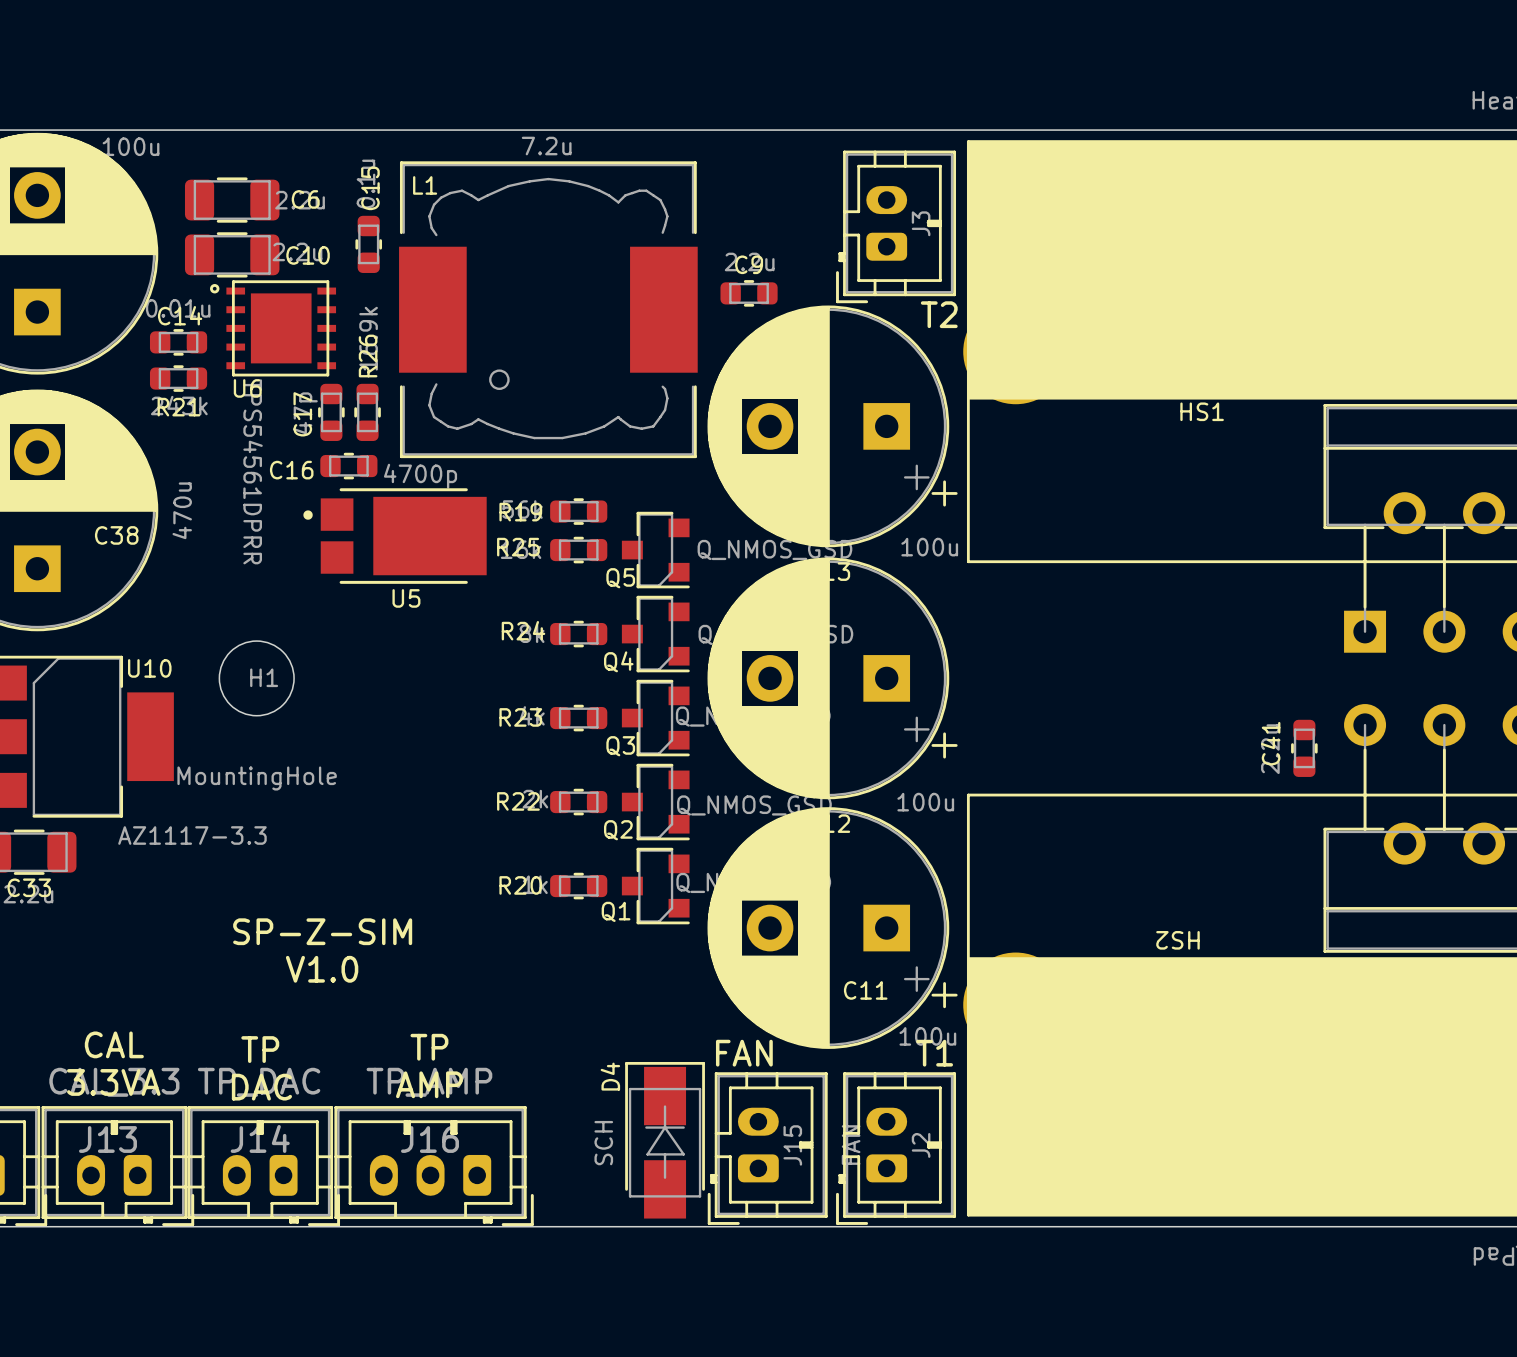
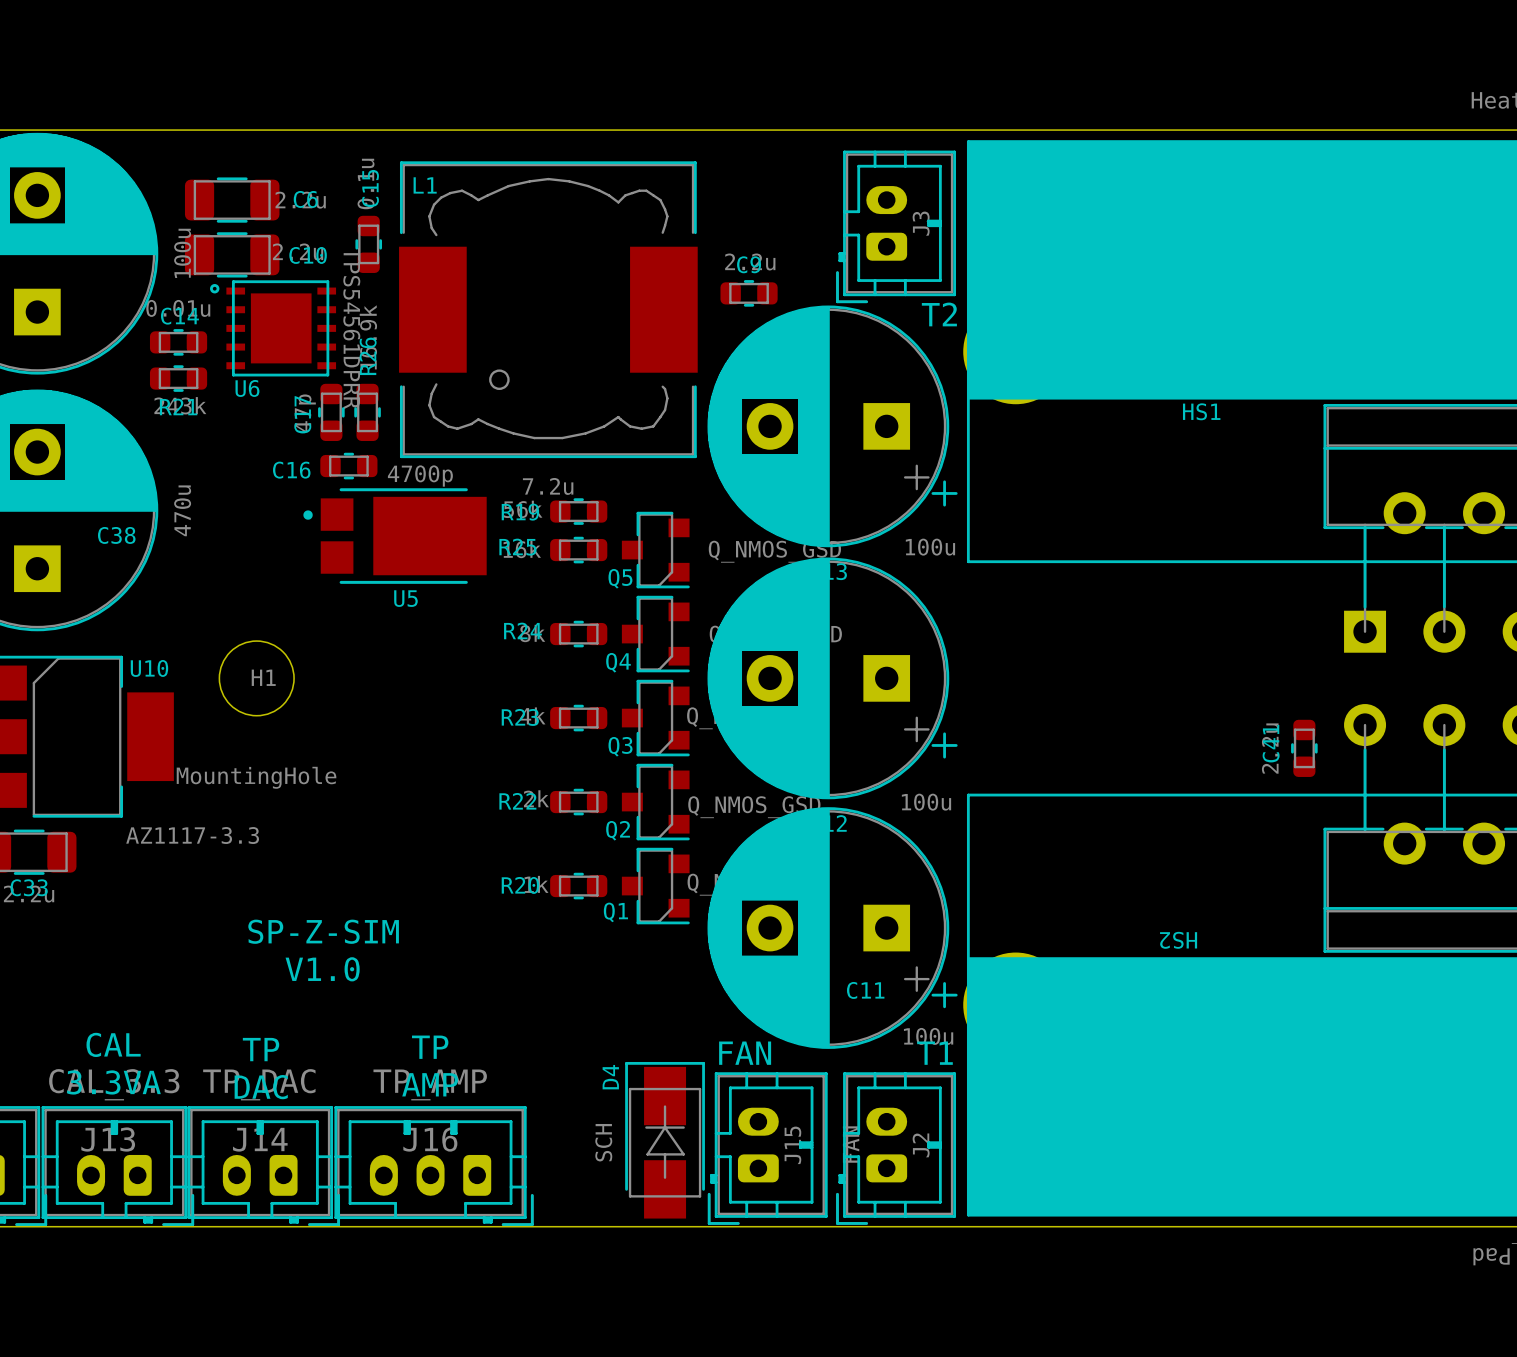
part value rotation: 0° (131, 146) -> 90° counterclockwise (182, 253)
part value position: 100u (131, 146) -> 100u (182, 253)
L1 value position: 7.2u (546, 146) -> 7.2u (548, 486)
U6 value position: TPS54561DPRR (253, 471) -> TPS54561DPRR (351, 328)

